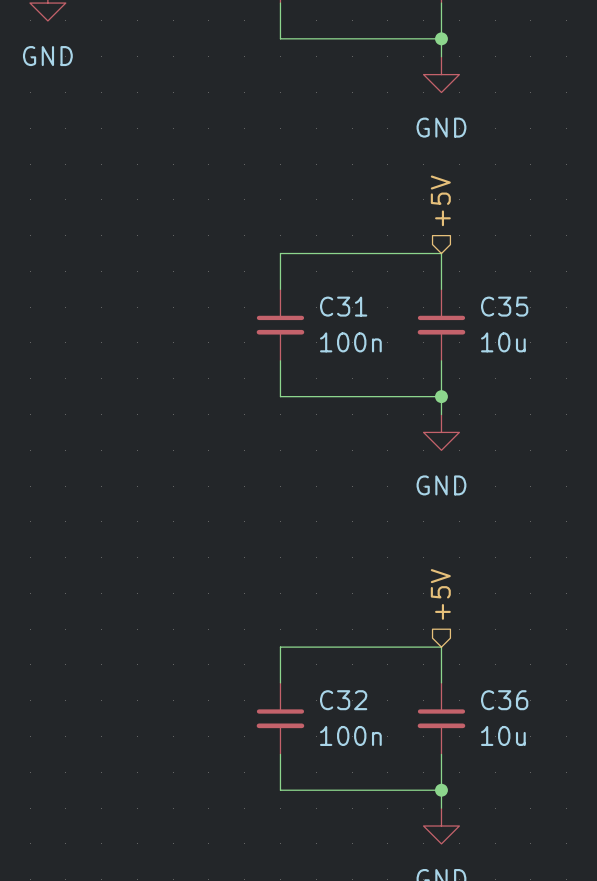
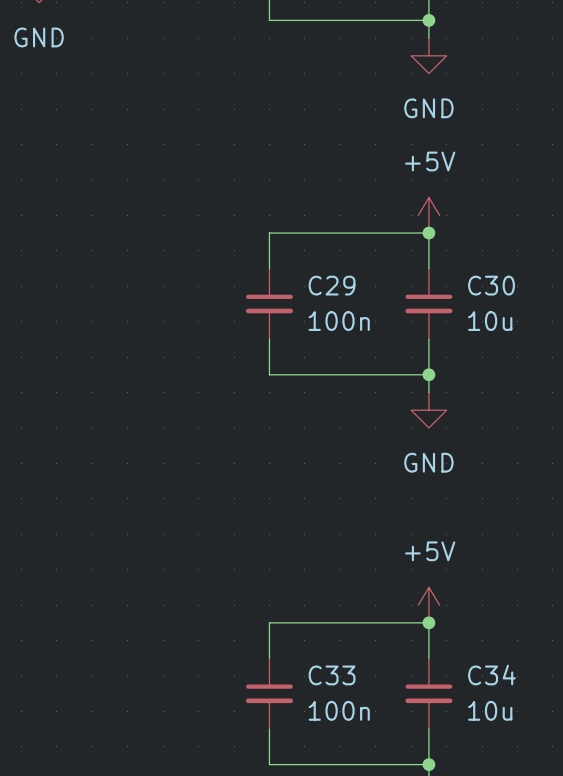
hierarchical label: +5V (440, 200) -> none
power symbol: none -> +5V (428, 215)
junction: none -> (428, 233)
C31 name: C31 (343, 306) -> C29 (332, 285)
C35 name: C35 (504, 306) -> C30 (491, 285)
hierarchical label: +5V (440, 594) -> none
power symbol: none -> +5V (428, 605)
junction: none -> (428, 622)
C32 name: C32 (343, 700) -> C33 (332, 675)
C36 name: C36 (504, 700) -> C34 (491, 675)

